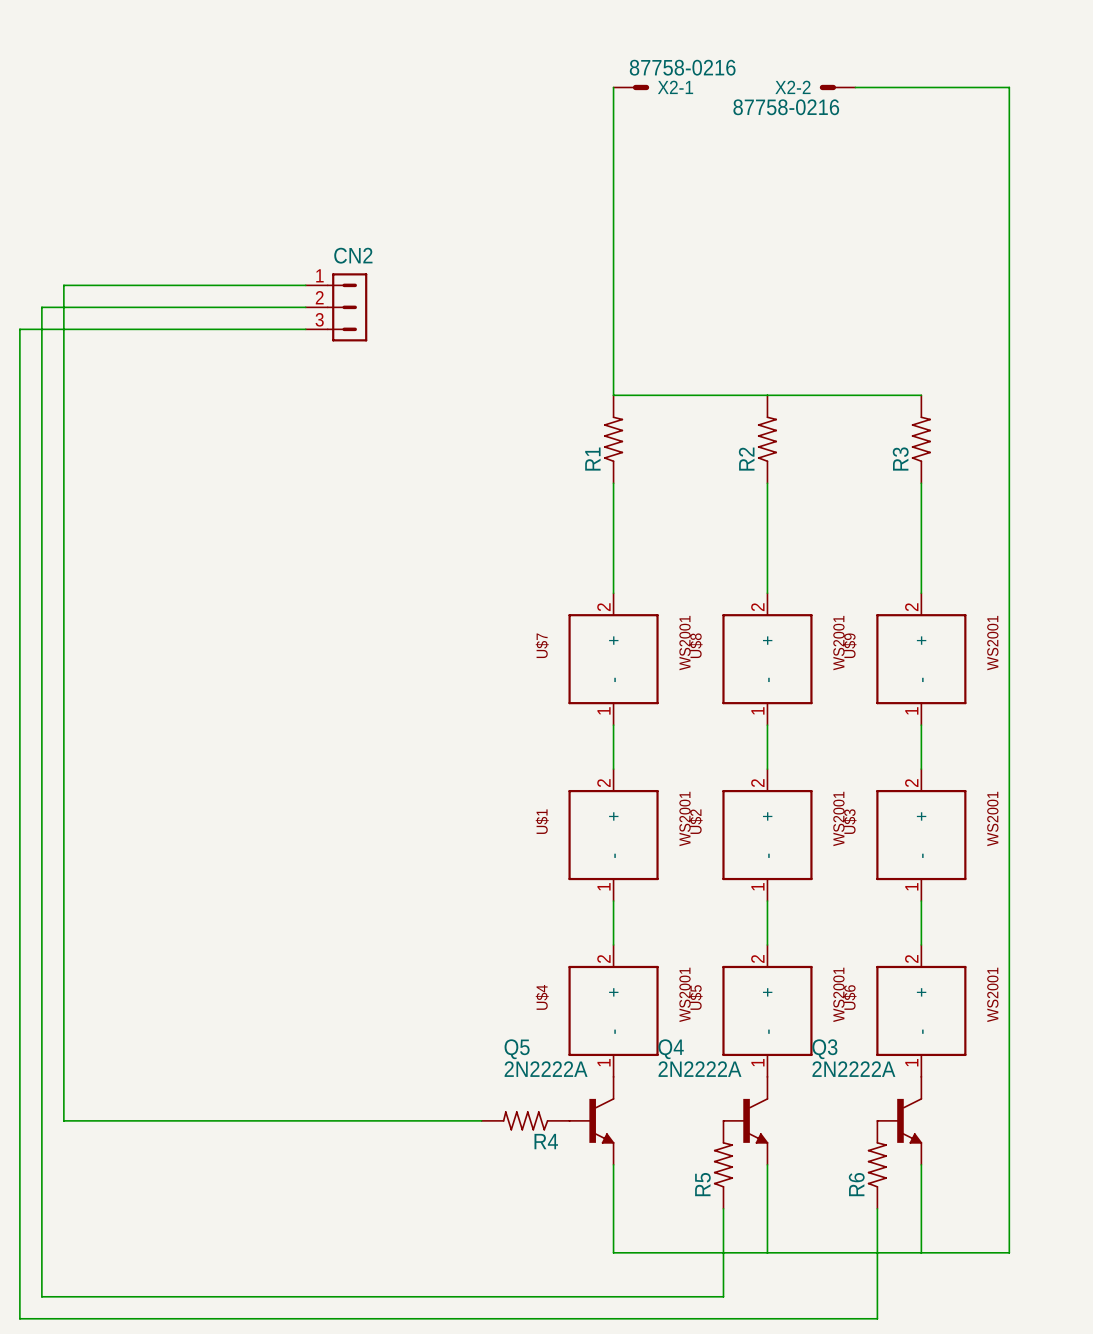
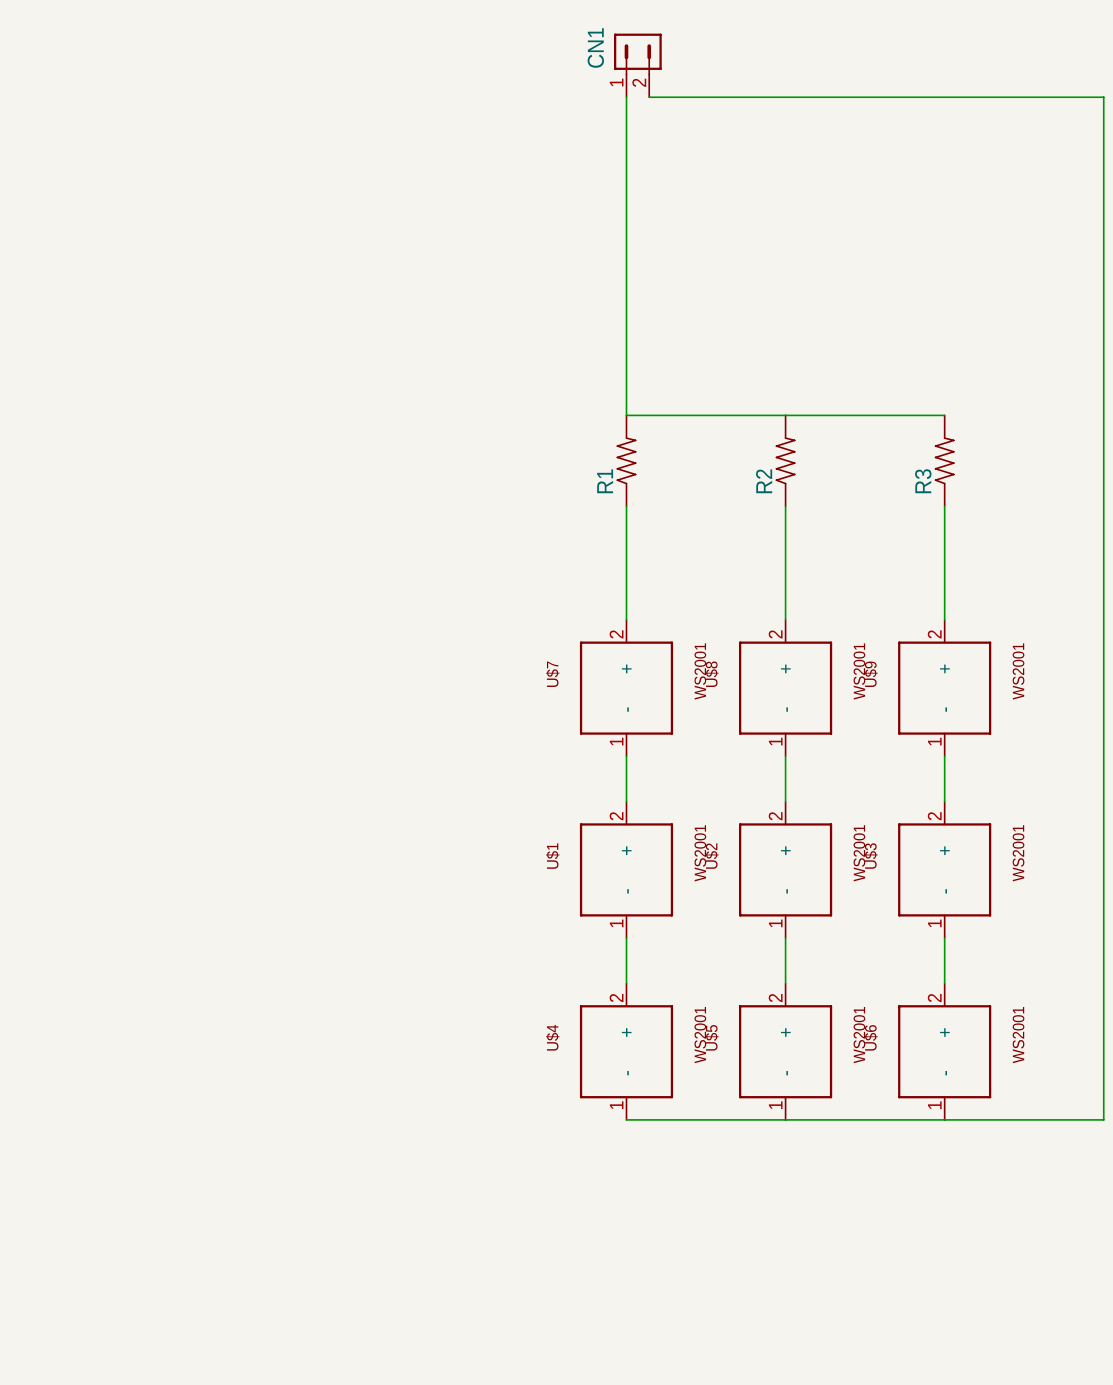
CN1: none -> (637, 65)
X2-1: 87758-0216 (631, 87) -> none
wire: none -> (649, 97) (876, 97)
X2-2: 87758-0216 (837, 87) -> none
wire: (1009, 87) (1009, 1252) (613, 1252) (613, 1164) -> (1035, 97) (1103, 97) (1103, 1119) (626, 1119)
wire: (305, 285) (63, 285) (63, 1120) (481, 1120) -> none
wire: (305, 307) (41, 307) (41, 1296) (723, 1296) (723, 1208) -> none
CN2: (336, 307) -> none
wire: (305, 329) (19, 329) (19, 1318) (877, 1318) (877, 1208) -> none
R4: (525, 1120) -> none
Q5: 2N2222A (591, 1120) -> none
Q4: 2N2222A (745, 1120) -> none
Q3: 2N2222A (899, 1120) -> none
R5: (723, 1164) -> none
wire: (767, 1164) (767, 1252) -> none
R6: (877, 1164) -> none
wire: (921, 1164) (921, 1252) -> none

